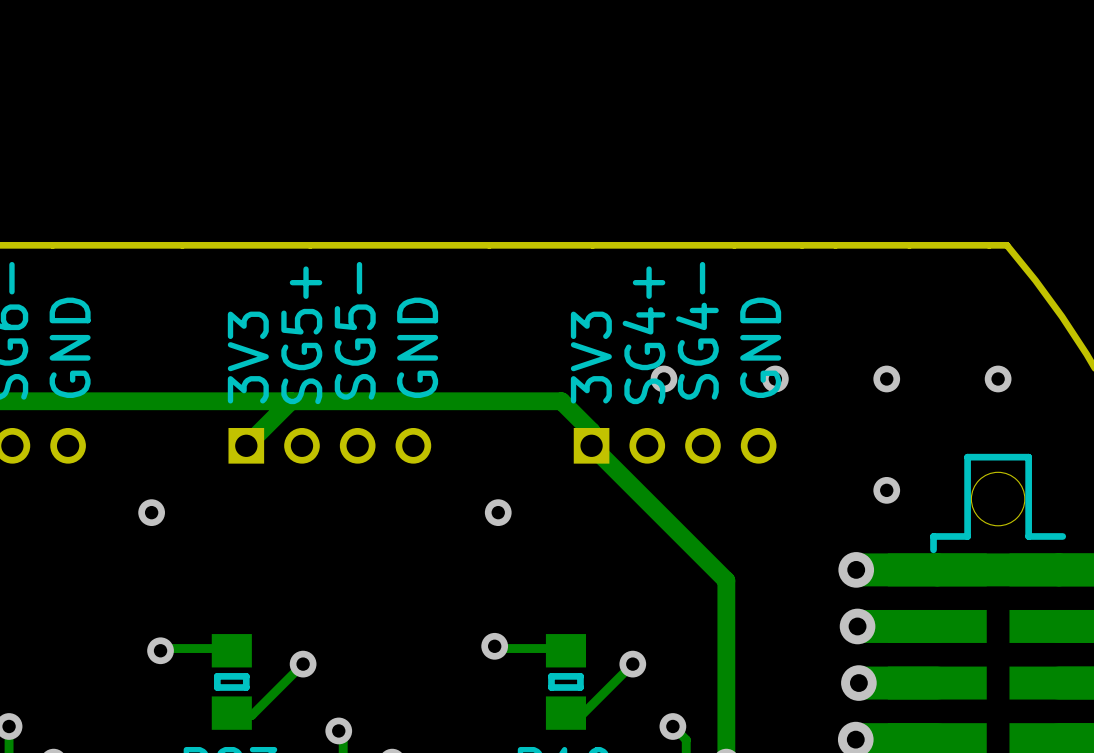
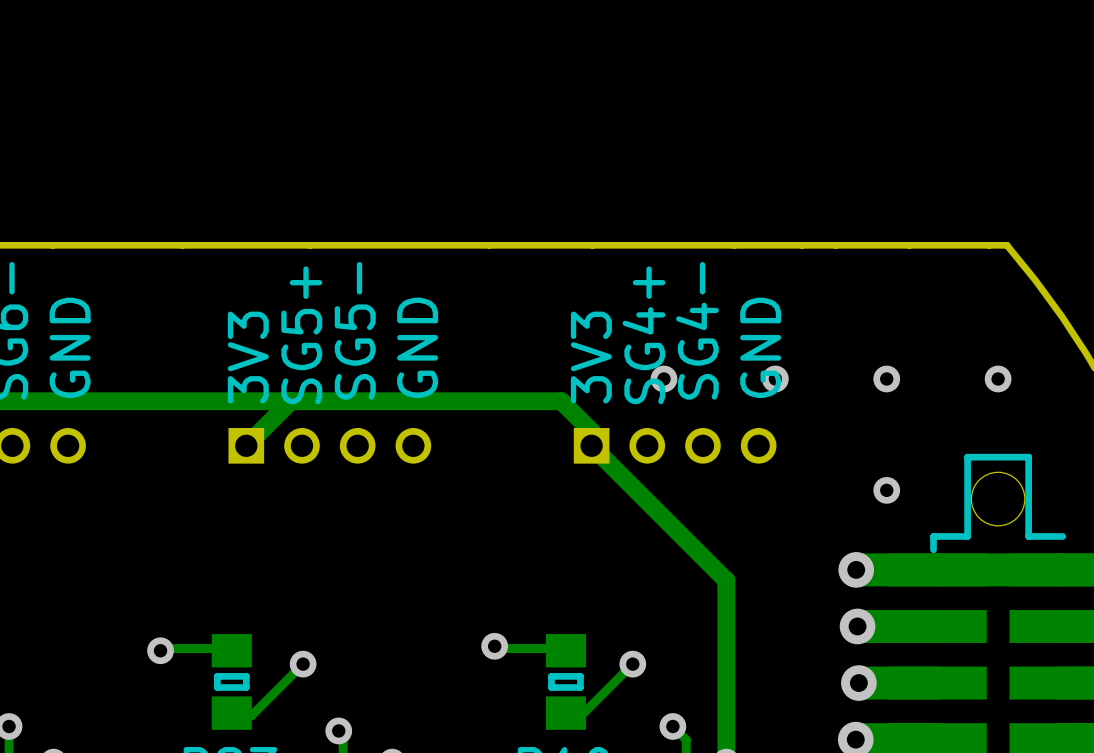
via: (151, 512) -> none
via: (498, 512) -> none

